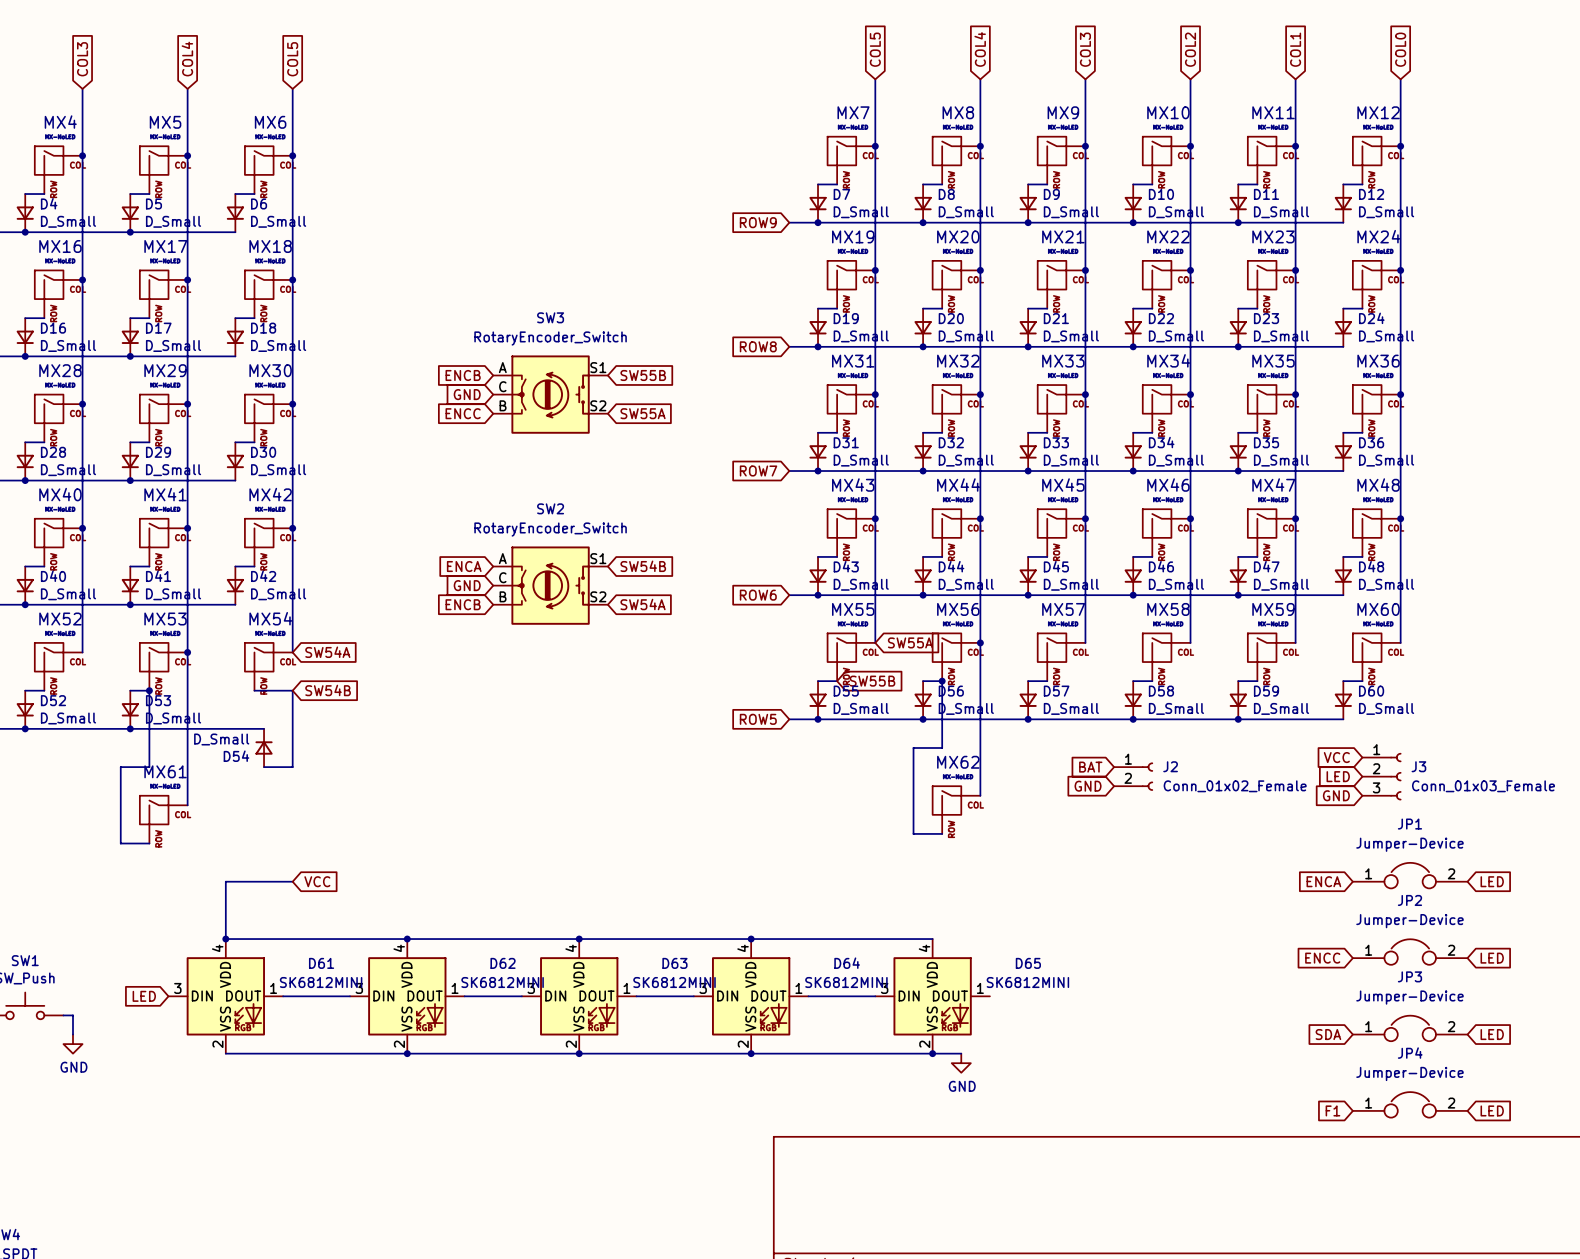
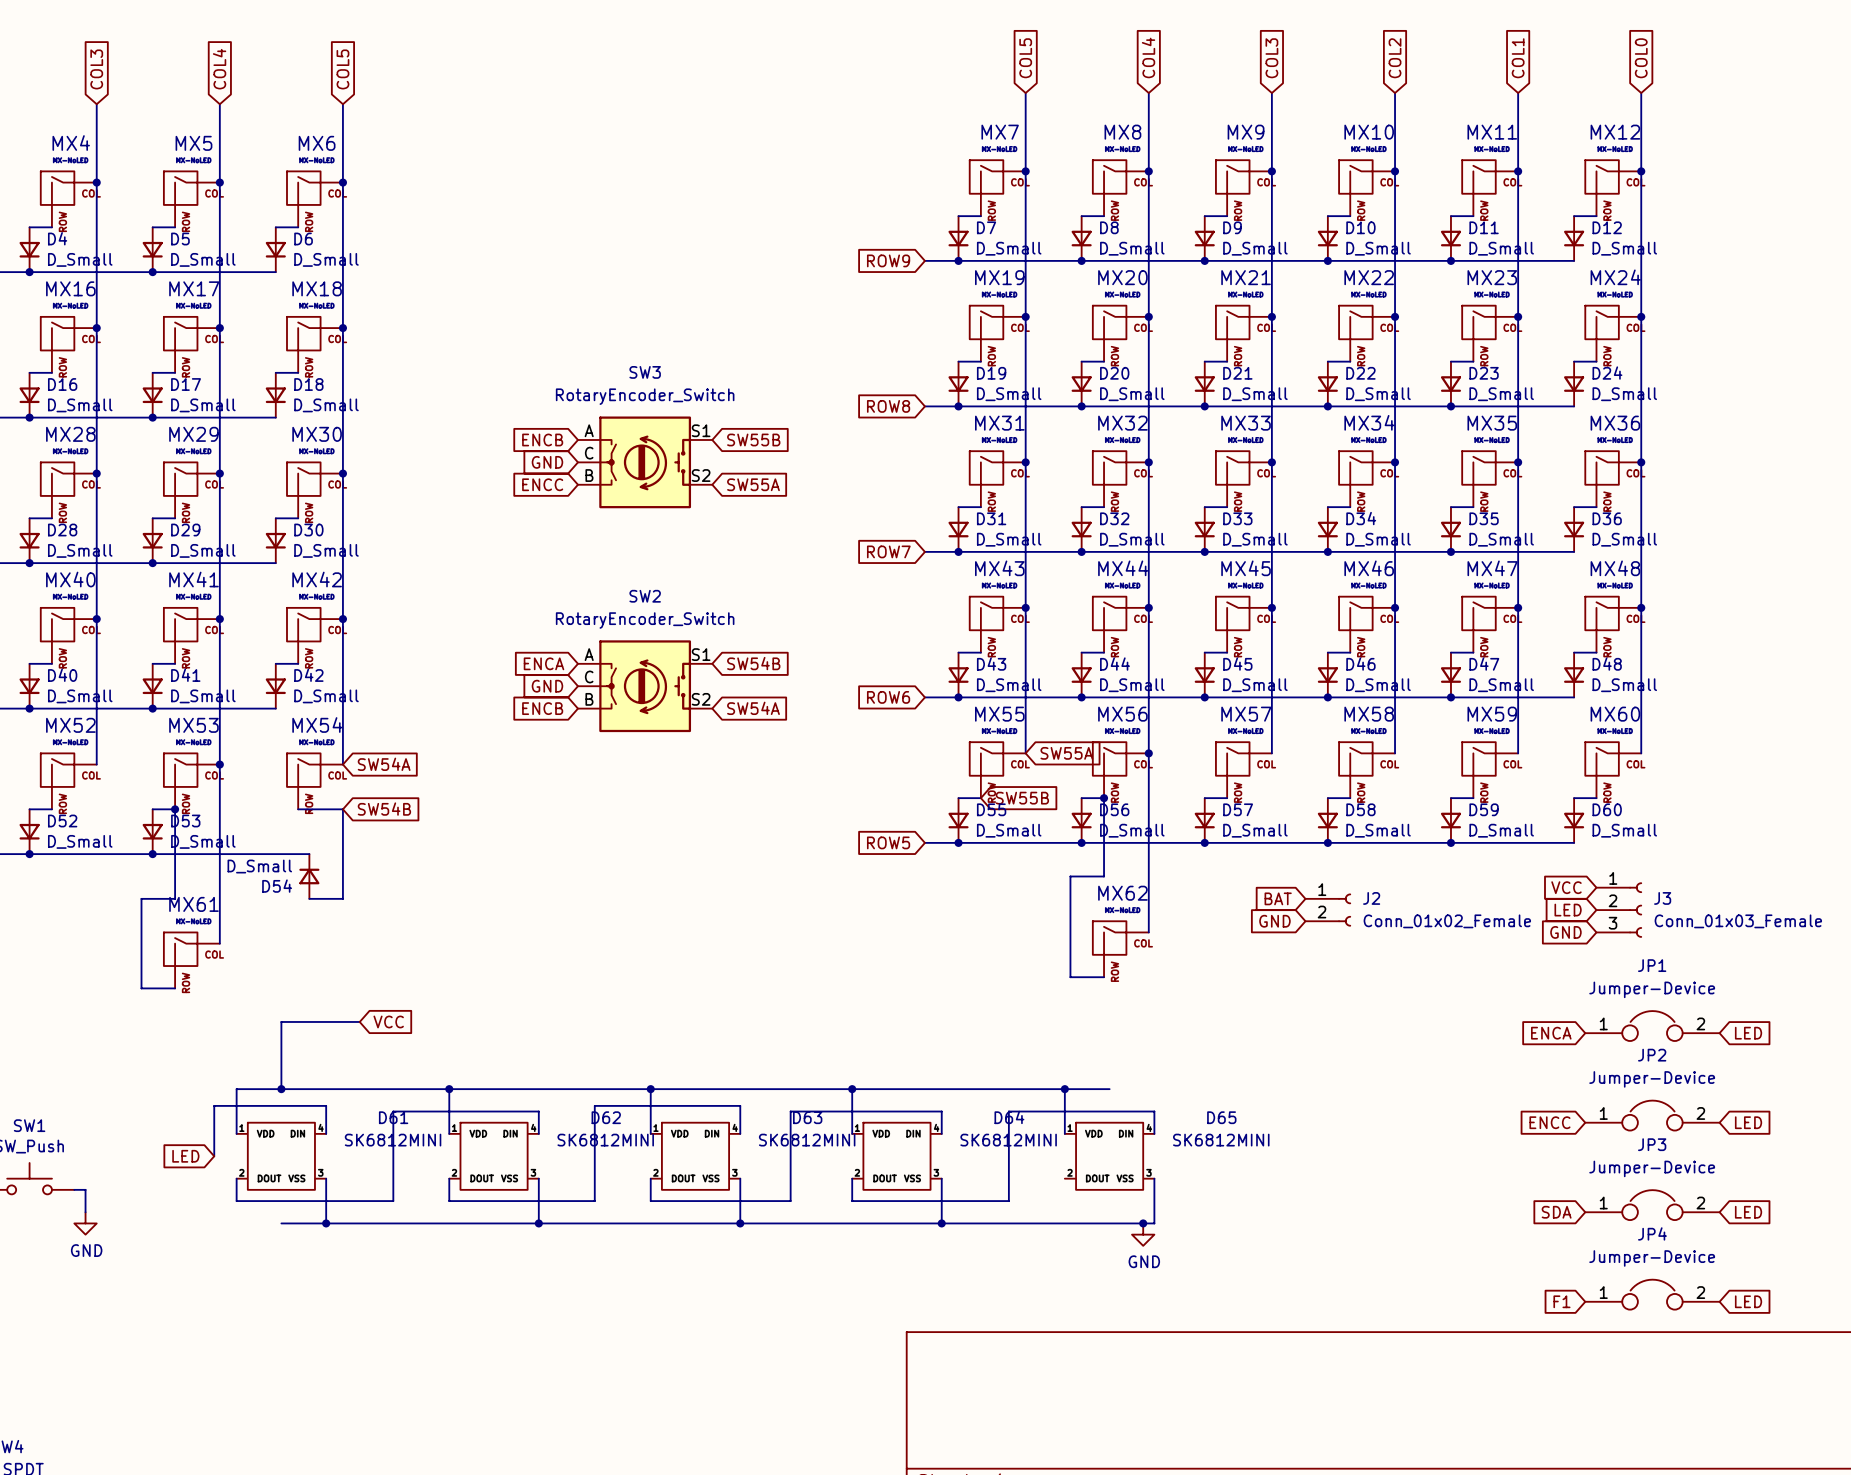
wire: none -> (359, 1021) (281, 1021) (281, 1089)
wire: (292, 881) (225, 881) (225, 939) (932, 939) -> none
global label position: VCC (317, 881) -> VCC (388, 1021)
wire: none -> (449, 1089) (449, 1133)
wire: none -> (650, 1089) (650, 1133)
wire: none -> (852, 1089) (852, 1133)
wire: none -> (1064, 1089) (1064, 1133)
junction: none -> (1064, 1089)
wire: none -> (1109, 1089) (236, 1089) (236, 1133)
D61 symbol: [168, 939, 284, 1054] -> [236, 1122, 327, 1190]
junction position: (225, 939) -> (281, 1089)
D62 symbol: [349, 939, 465, 1054] -> [449, 1122, 539, 1190]
junction position: (407, 939) -> (449, 1089)
D63 symbol: [521, 939, 637, 1054] -> [650, 1122, 741, 1190]
junction position: (579, 939) -> (650, 1089)
D64 symbol: [693, 939, 809, 1054] -> [852, 1122, 942, 1190]
junction position: (751, 939) -> (852, 1089)
D65 symbol: [875, 939, 990, 1054] -> [1064, 1122, 1155, 1190]
wire: none -> (326, 1133) (326, 1105) (214, 1105) (214, 1156)
wire: none -> (538, 1133) (538, 1111) (393, 1111) (393, 1201) (236, 1201) (236, 1178)
wire: none -> (740, 1133) (740, 1105) (594, 1105) (594, 1201) (449, 1201) (449, 1178)
wire: none -> (941, 1133) (941, 1111) (790, 1111) (790, 1201) (650, 1201) (650, 1178)
wire: none -> (1154, 1133) (1154, 1111) (1008, 1111) (1008, 1201) (852, 1201) (852, 1178)
global label position: LED (144, 996) -> LED (185, 1156)
wire: (283, 996) (349, 996) -> none
wire: (464, 996) (521, 996) -> none
wire: (636, 996) (693, 996) -> none
wire: (808, 996) (875, 996) -> none
wire: none -> (326, 1178) (326, 1223)
wire: none -> (538, 1178) (538, 1223)
wire: none -> (740, 1178) (740, 1223)
wire: none -> (941, 1178) (941, 1223)
wire: none -> (1154, 1178) (1154, 1223) (281, 1223)
junction: none -> (326, 1223)
junction: none -> (538, 1223)
junction: none -> (740, 1223)
junction: none -> (941, 1223)
wire: (225, 1053) (961, 1053) -> none
junction: (407, 1053) -> none
junction: (579, 1053) -> none
junction: (751, 1053) -> none
junction position: (932, 1053) -> (1143, 1223)
power symbol position: GND (961, 1063) -> GND (1143, 1234)

